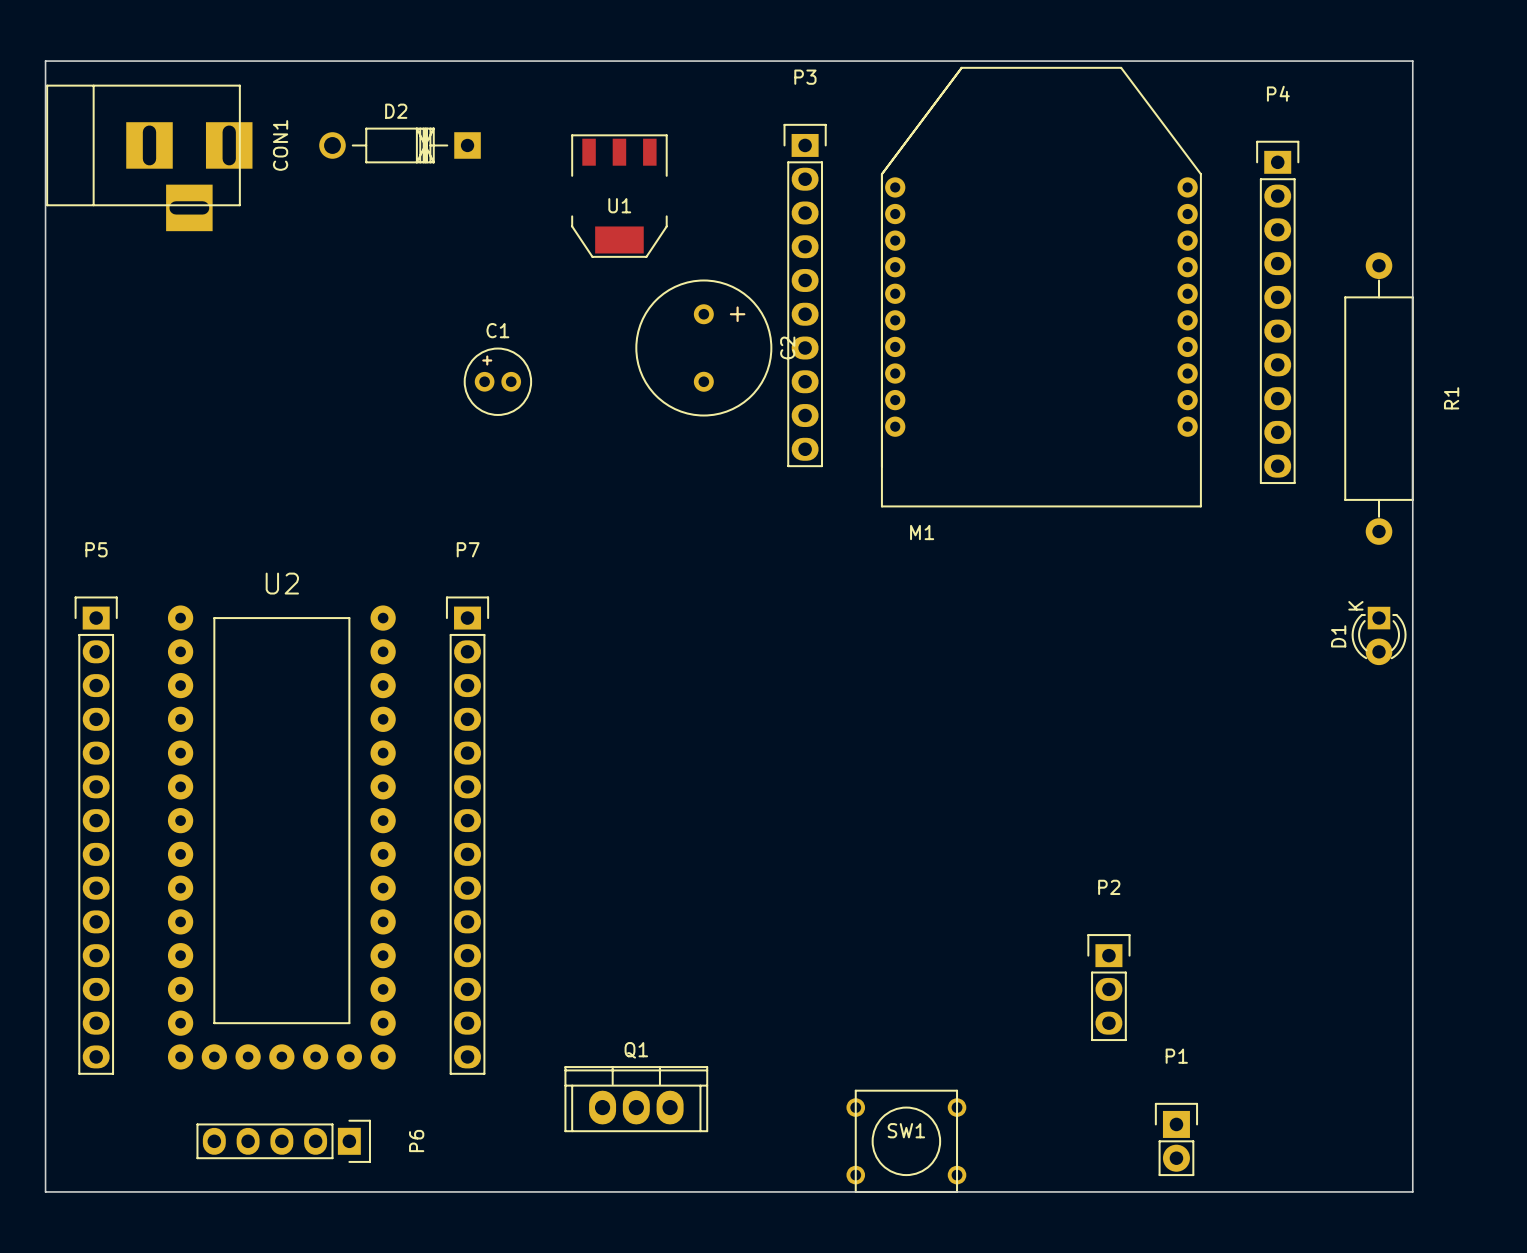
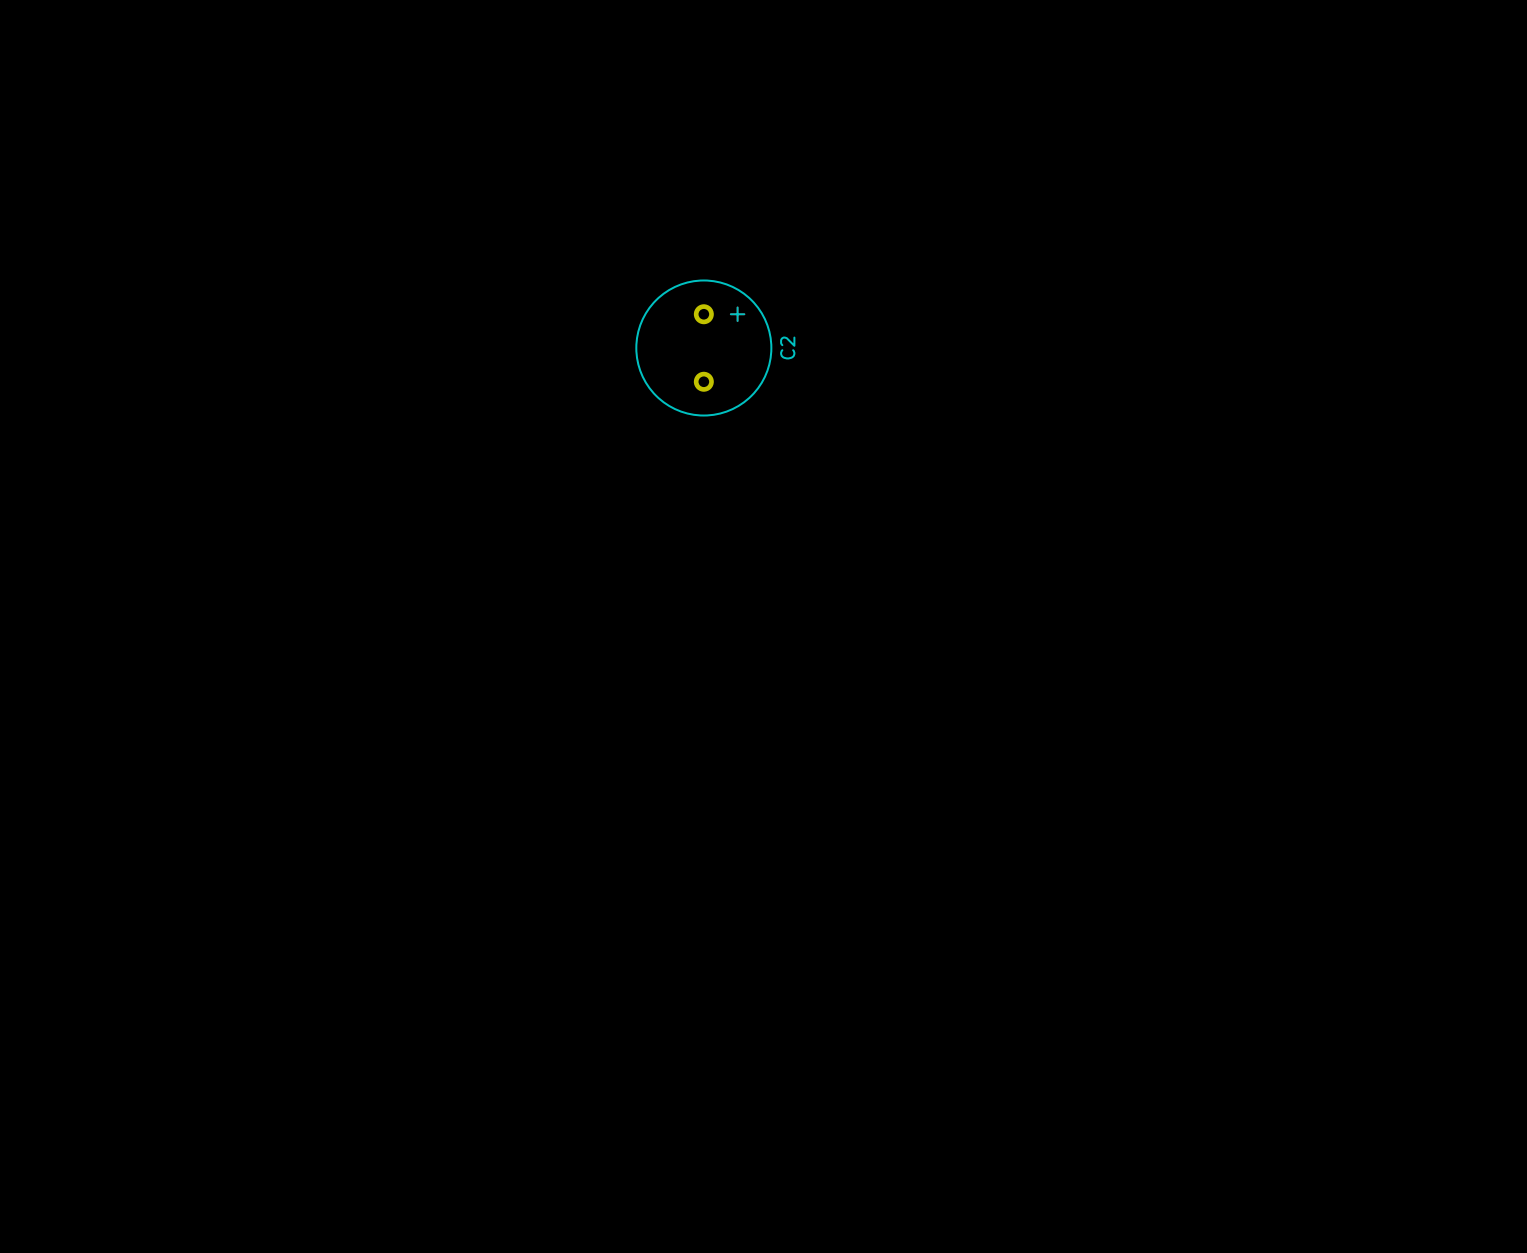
board edge: (45, 61) (1412, 61) (1412, 1191) (45, 1191) (45, 61) -> none
D2: (400, 145) -> none
CON1: (149, 157) -> none
U1: (619, 196) -> none
M1: (1041, 287) -> none
P3: (805, 295) -> none
P4: (1277, 312) -> none
C1: (497, 381) -> none
R1: (1379, 398) -> none
D1: (1379, 635) -> none
P5: (96, 835) -> none
P7: (467, 835) -> none
U2: (281, 837) -> none
P2: (1108, 987) -> none
Q1: (636, 1099) -> none
P1: (1176, 1139) -> none
P6: (283, 1141) -> none
SW1: (906, 1141) -> none

